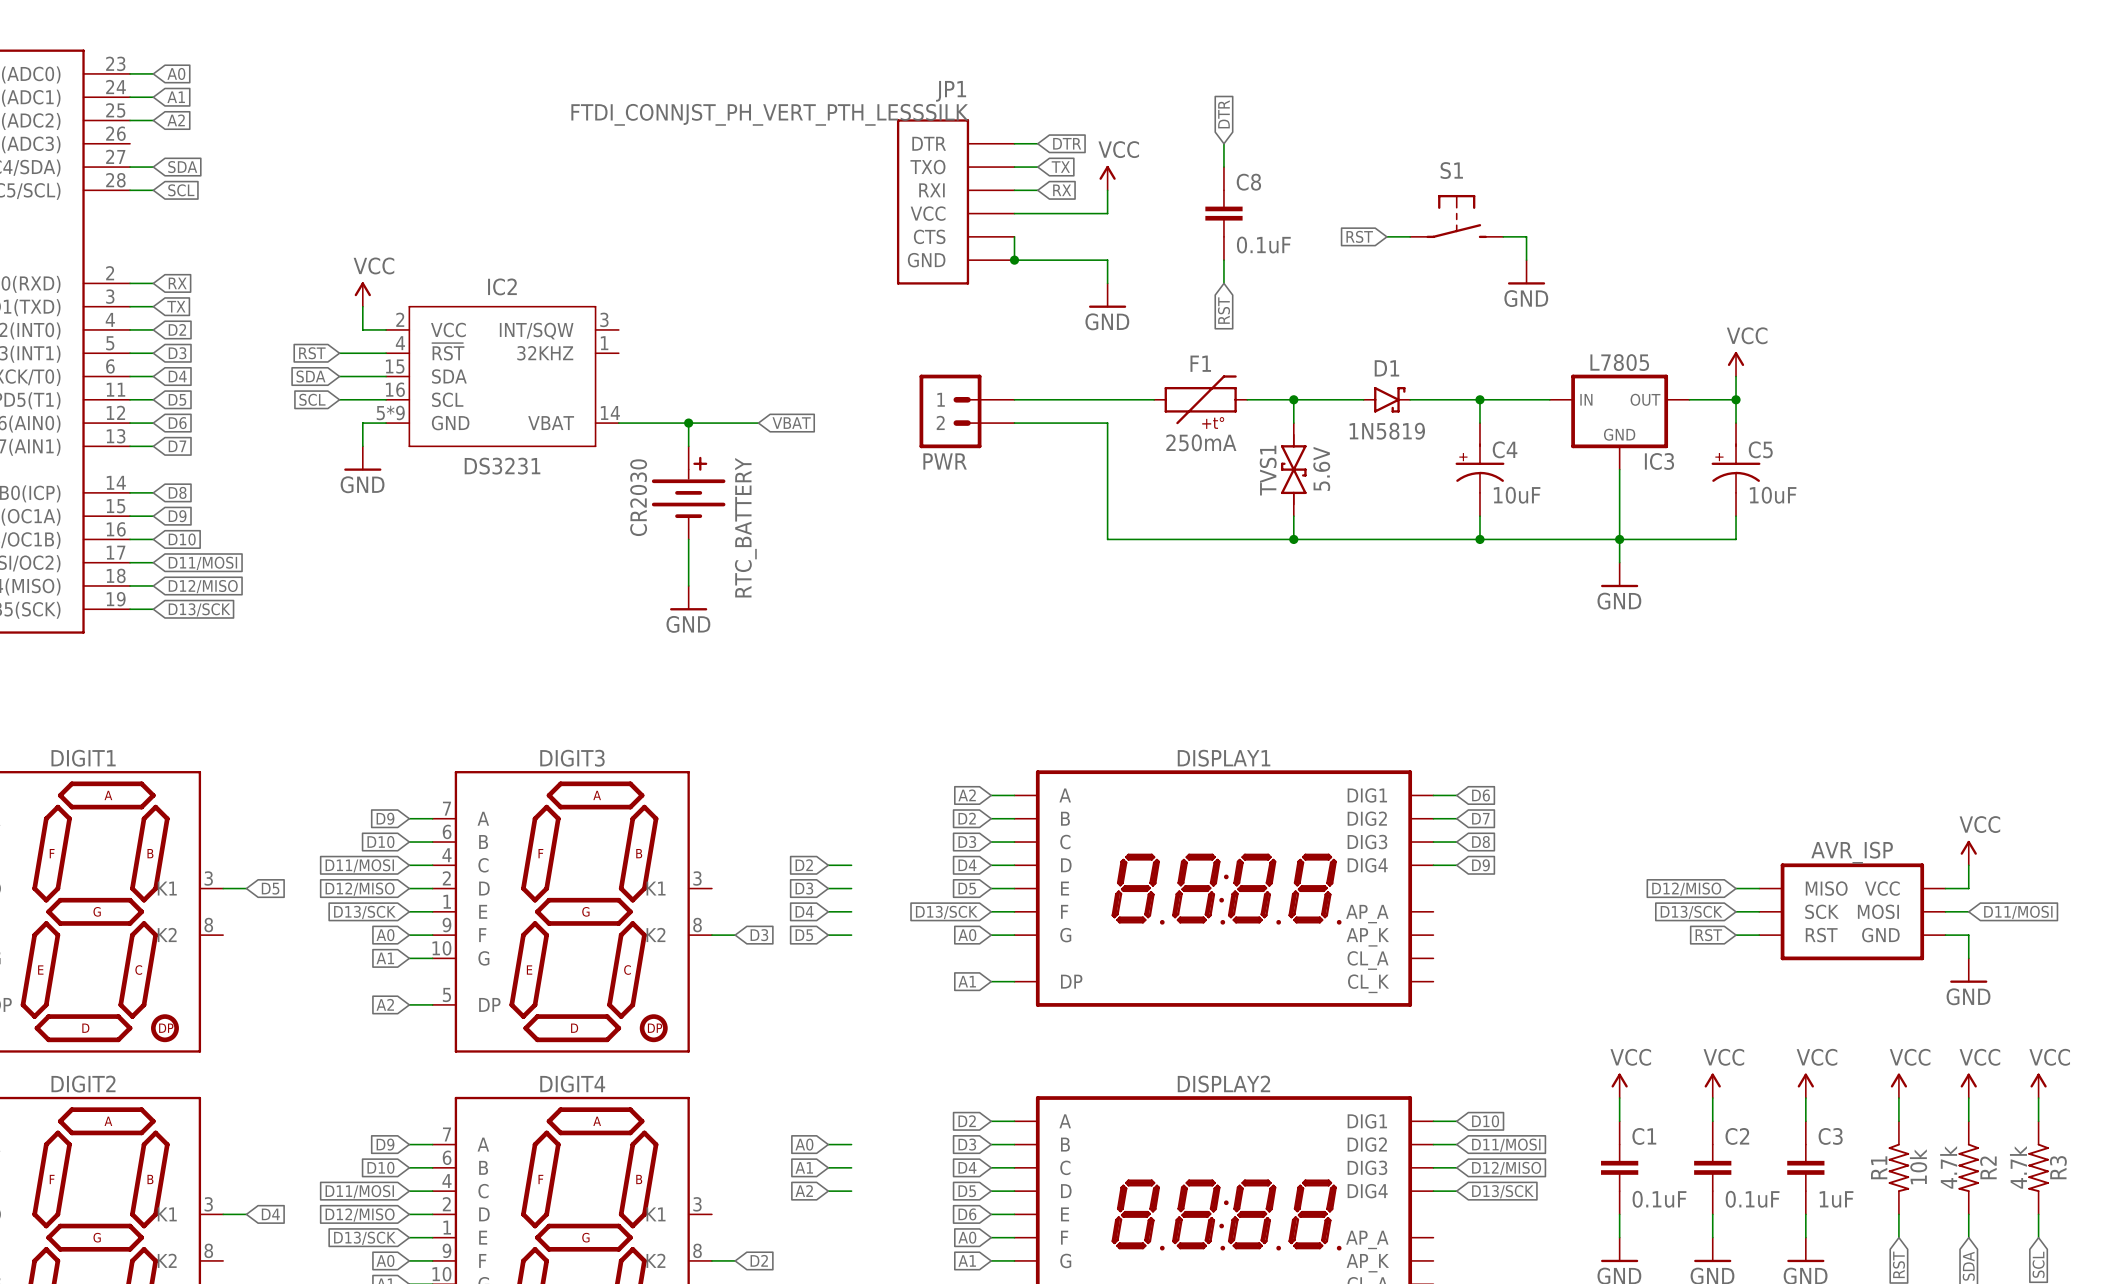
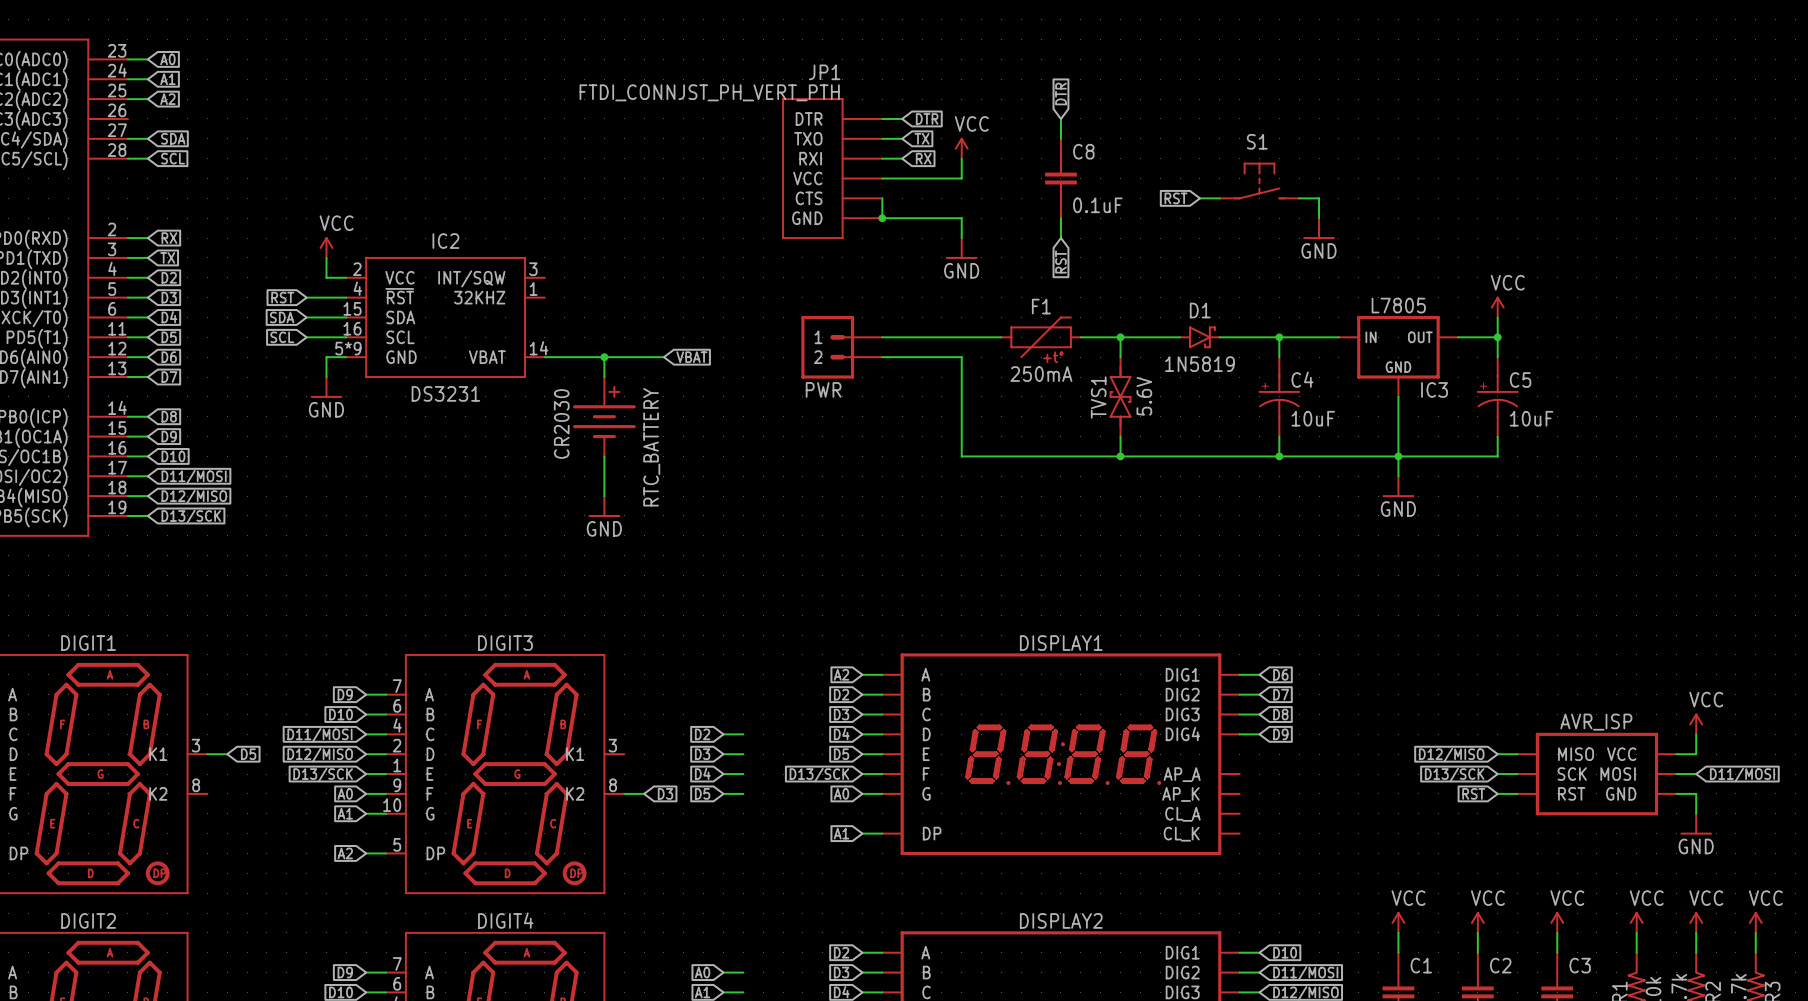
JP1 value: FTDI_CONNJST_PH_VERT_PTH_LESSSILK (769, 114) -> FTDI_CONNJST_PH_VERT_PTH (709, 92)

